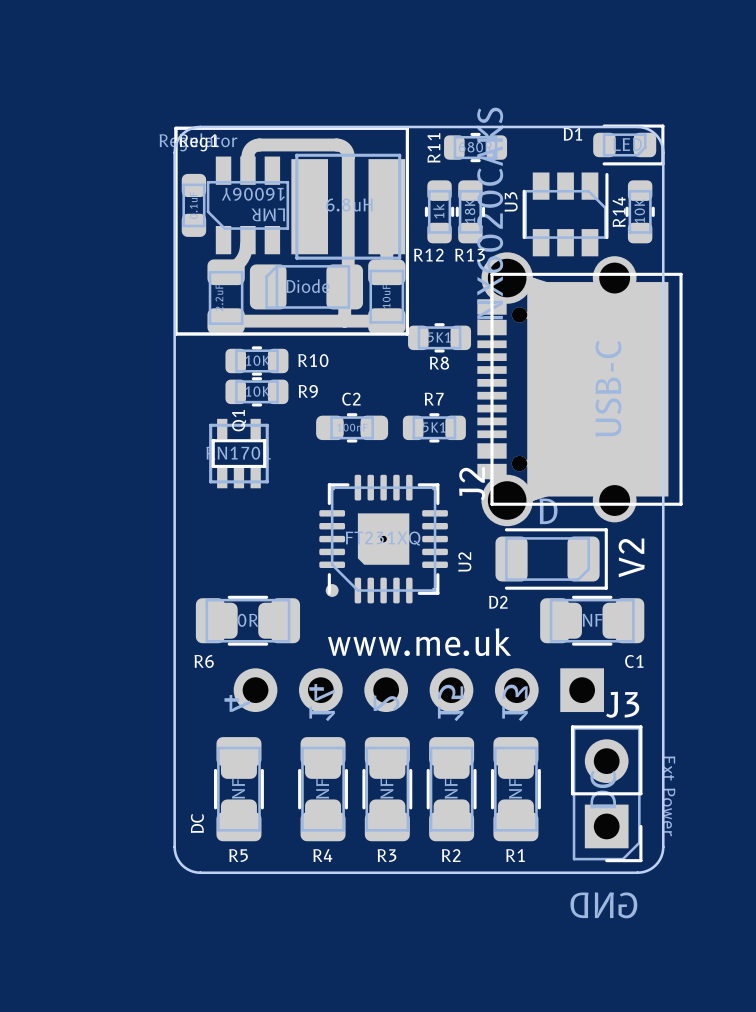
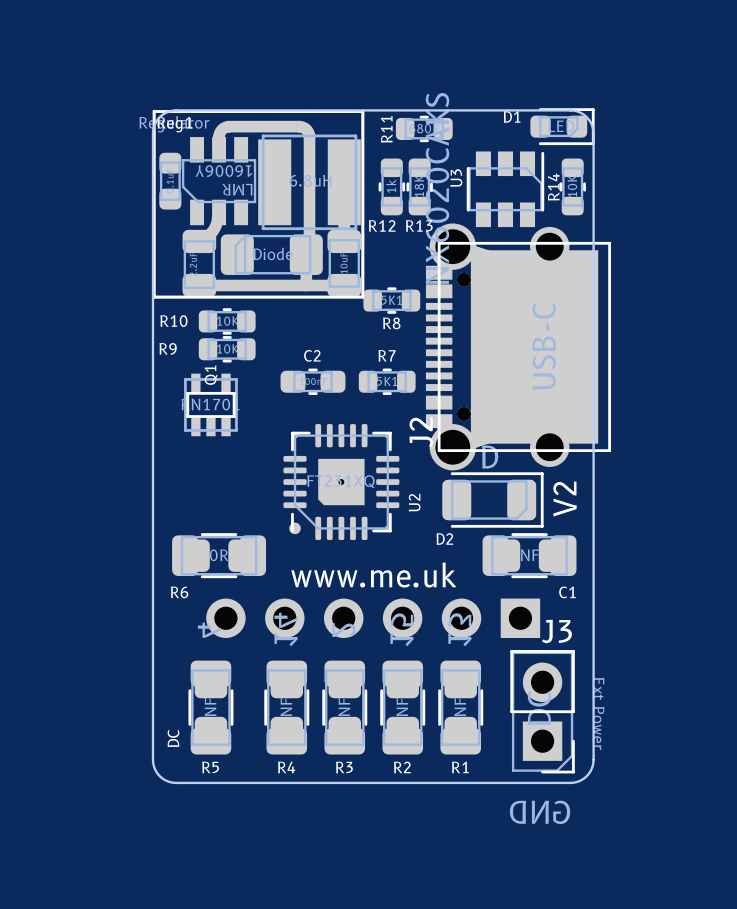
R10 name position: R10 (313, 360) -> R10 (173, 321)
R9 name position: R9 (308, 391) -> R9 (168, 348)

